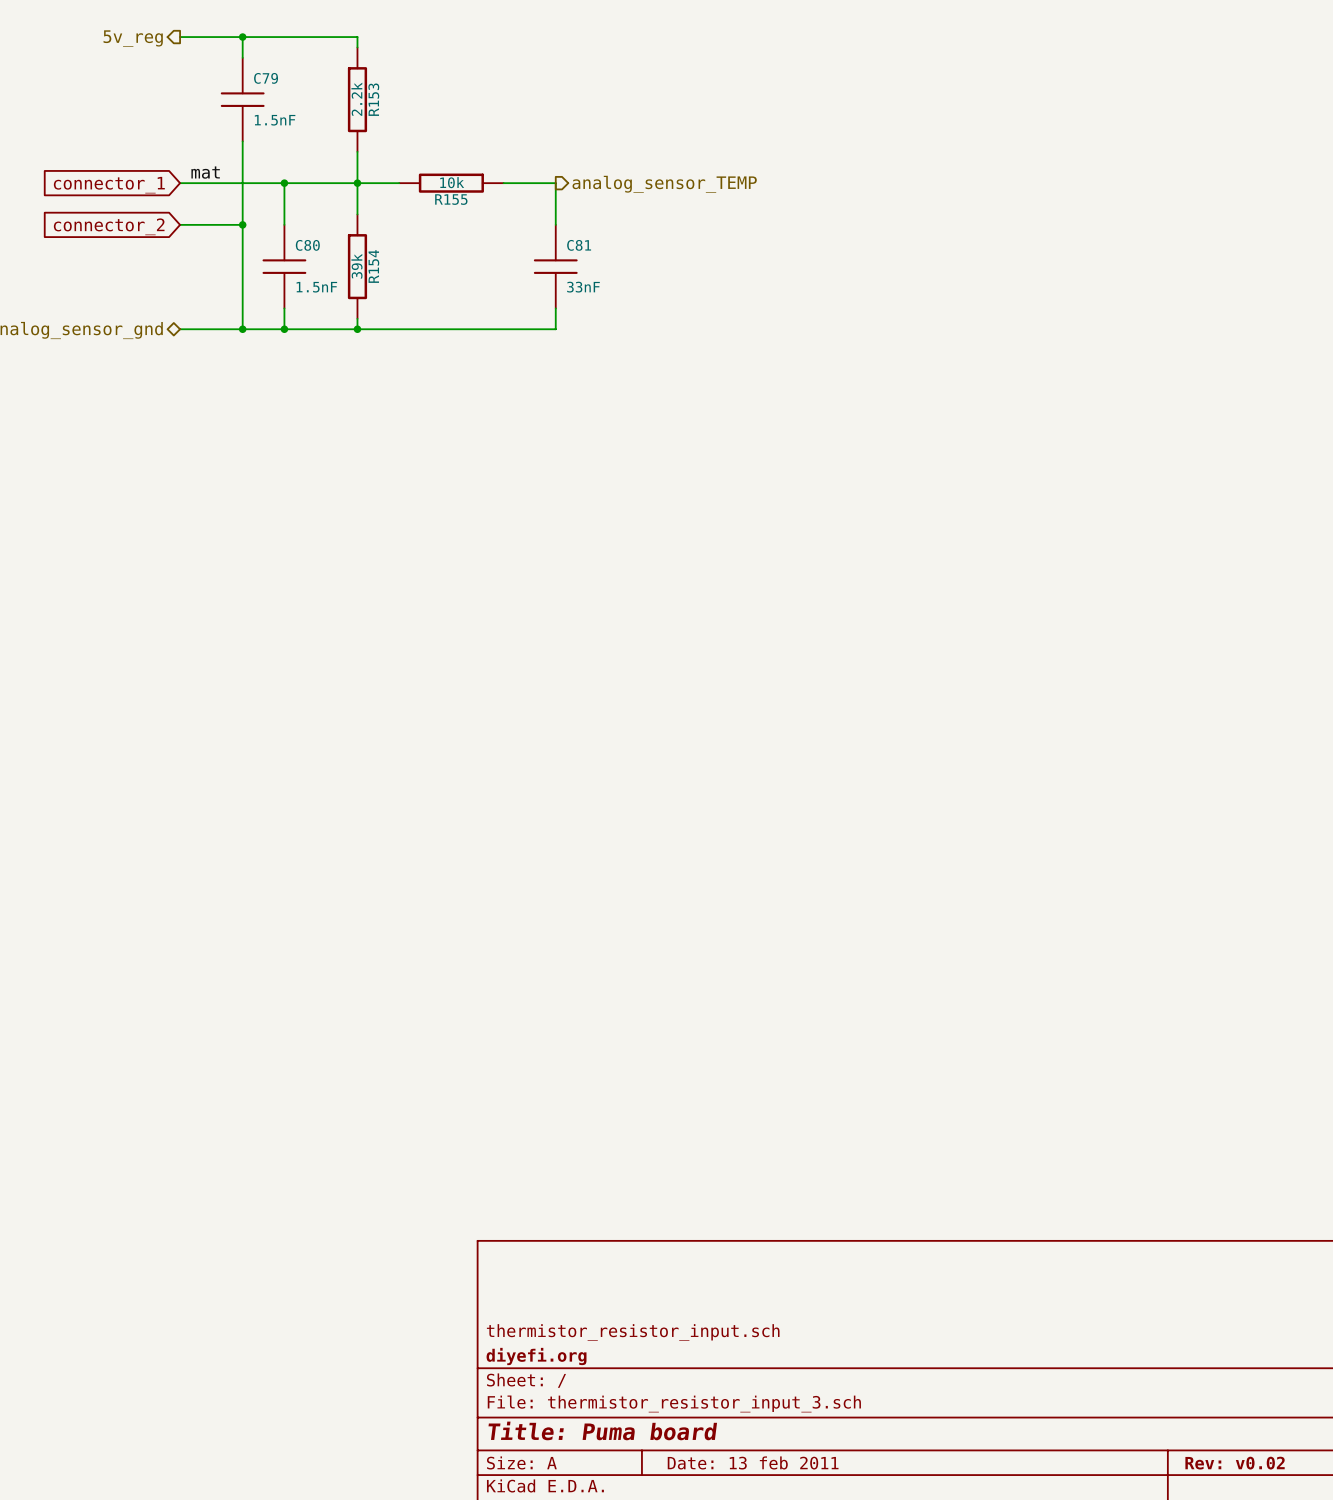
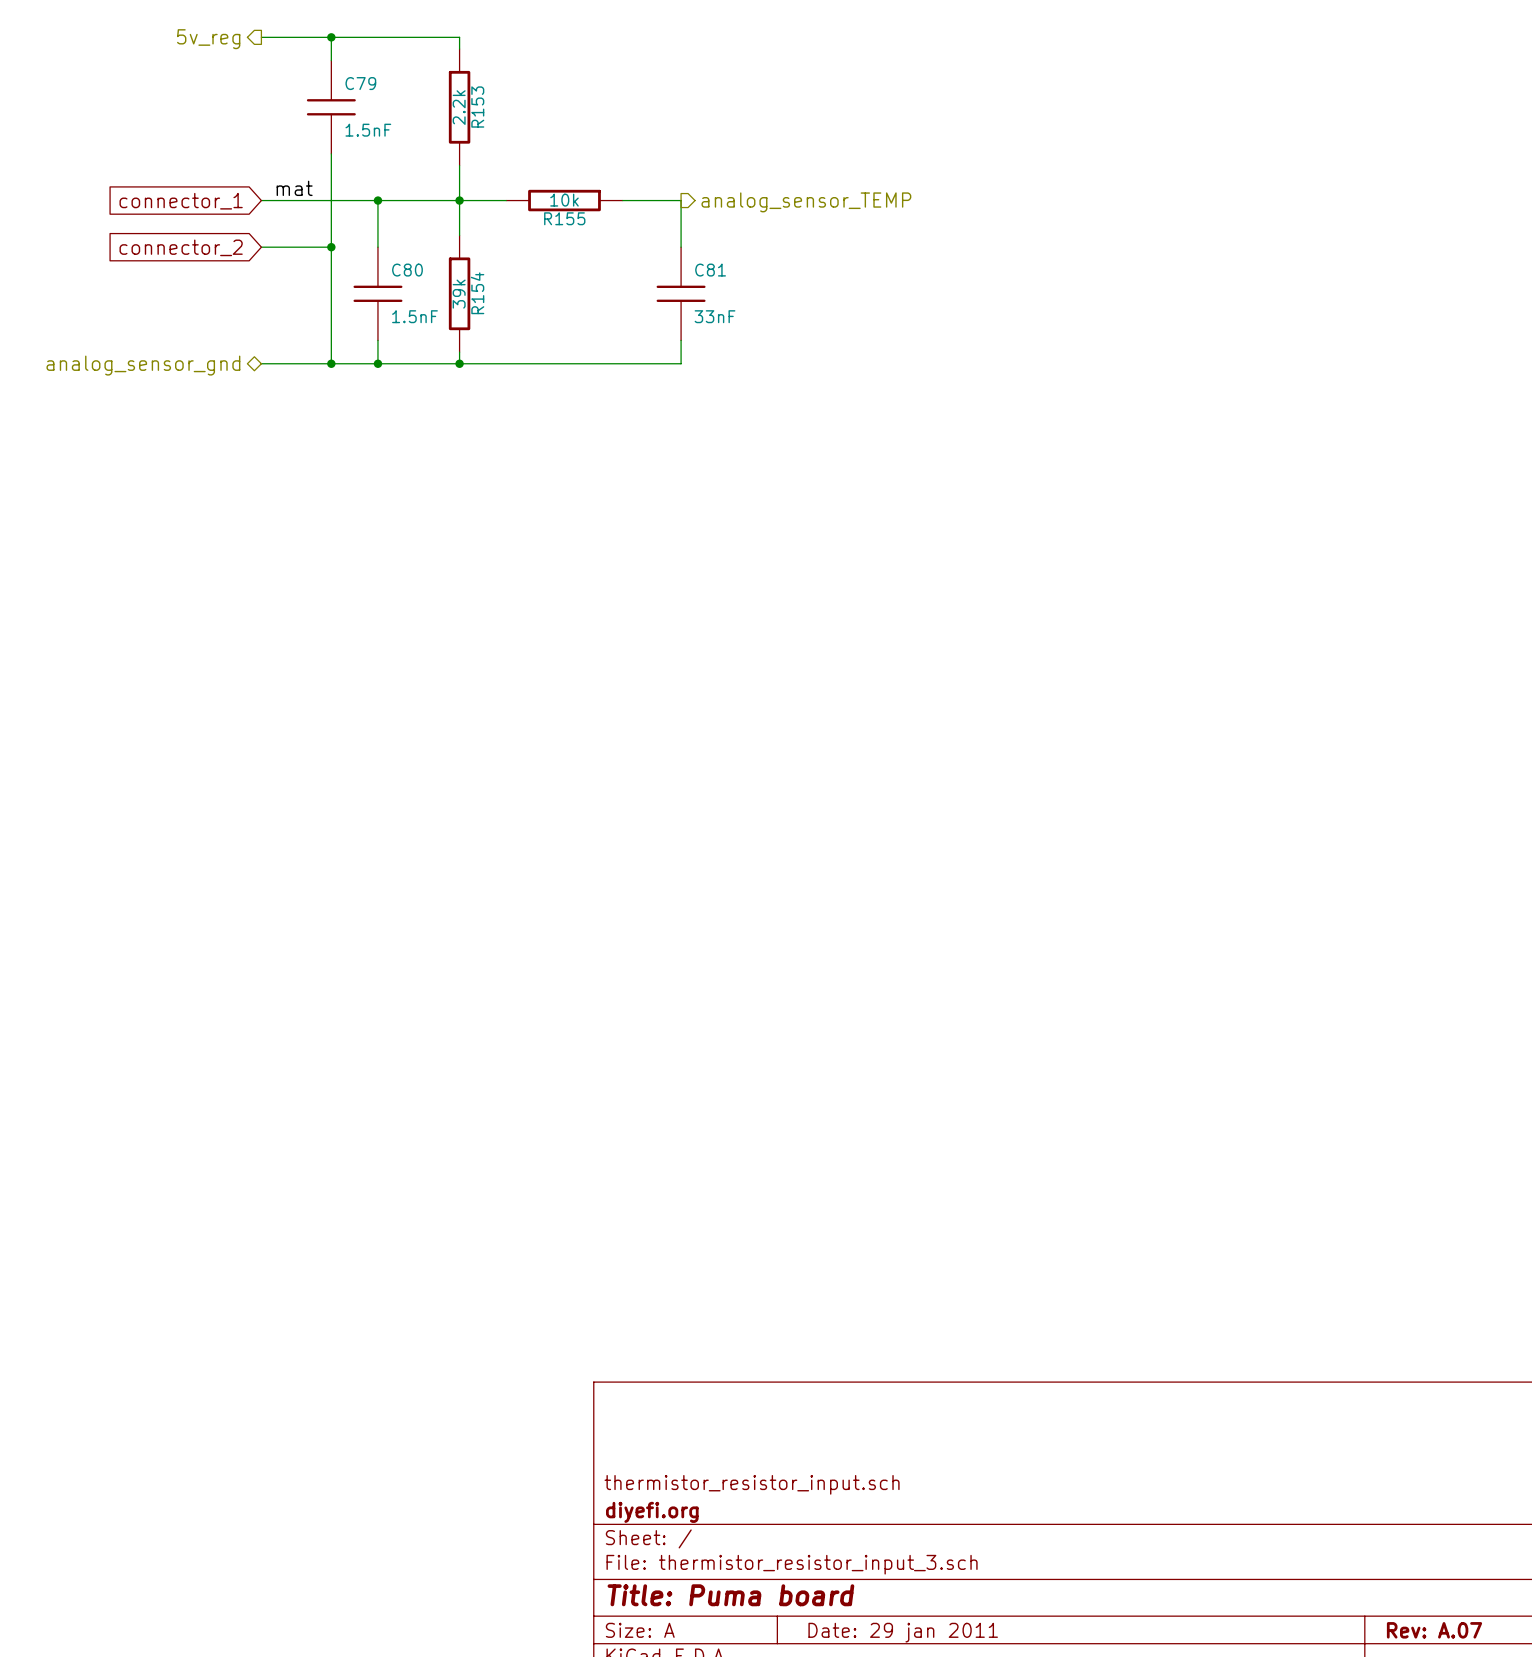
title block: Date: 13 feb 2011 (753, 1462) -> Date: 29 jan 2011 (903, 1632)
title block: Rev: v0.02 (1235, 1463) -> Rev: A.07 (1434, 1630)

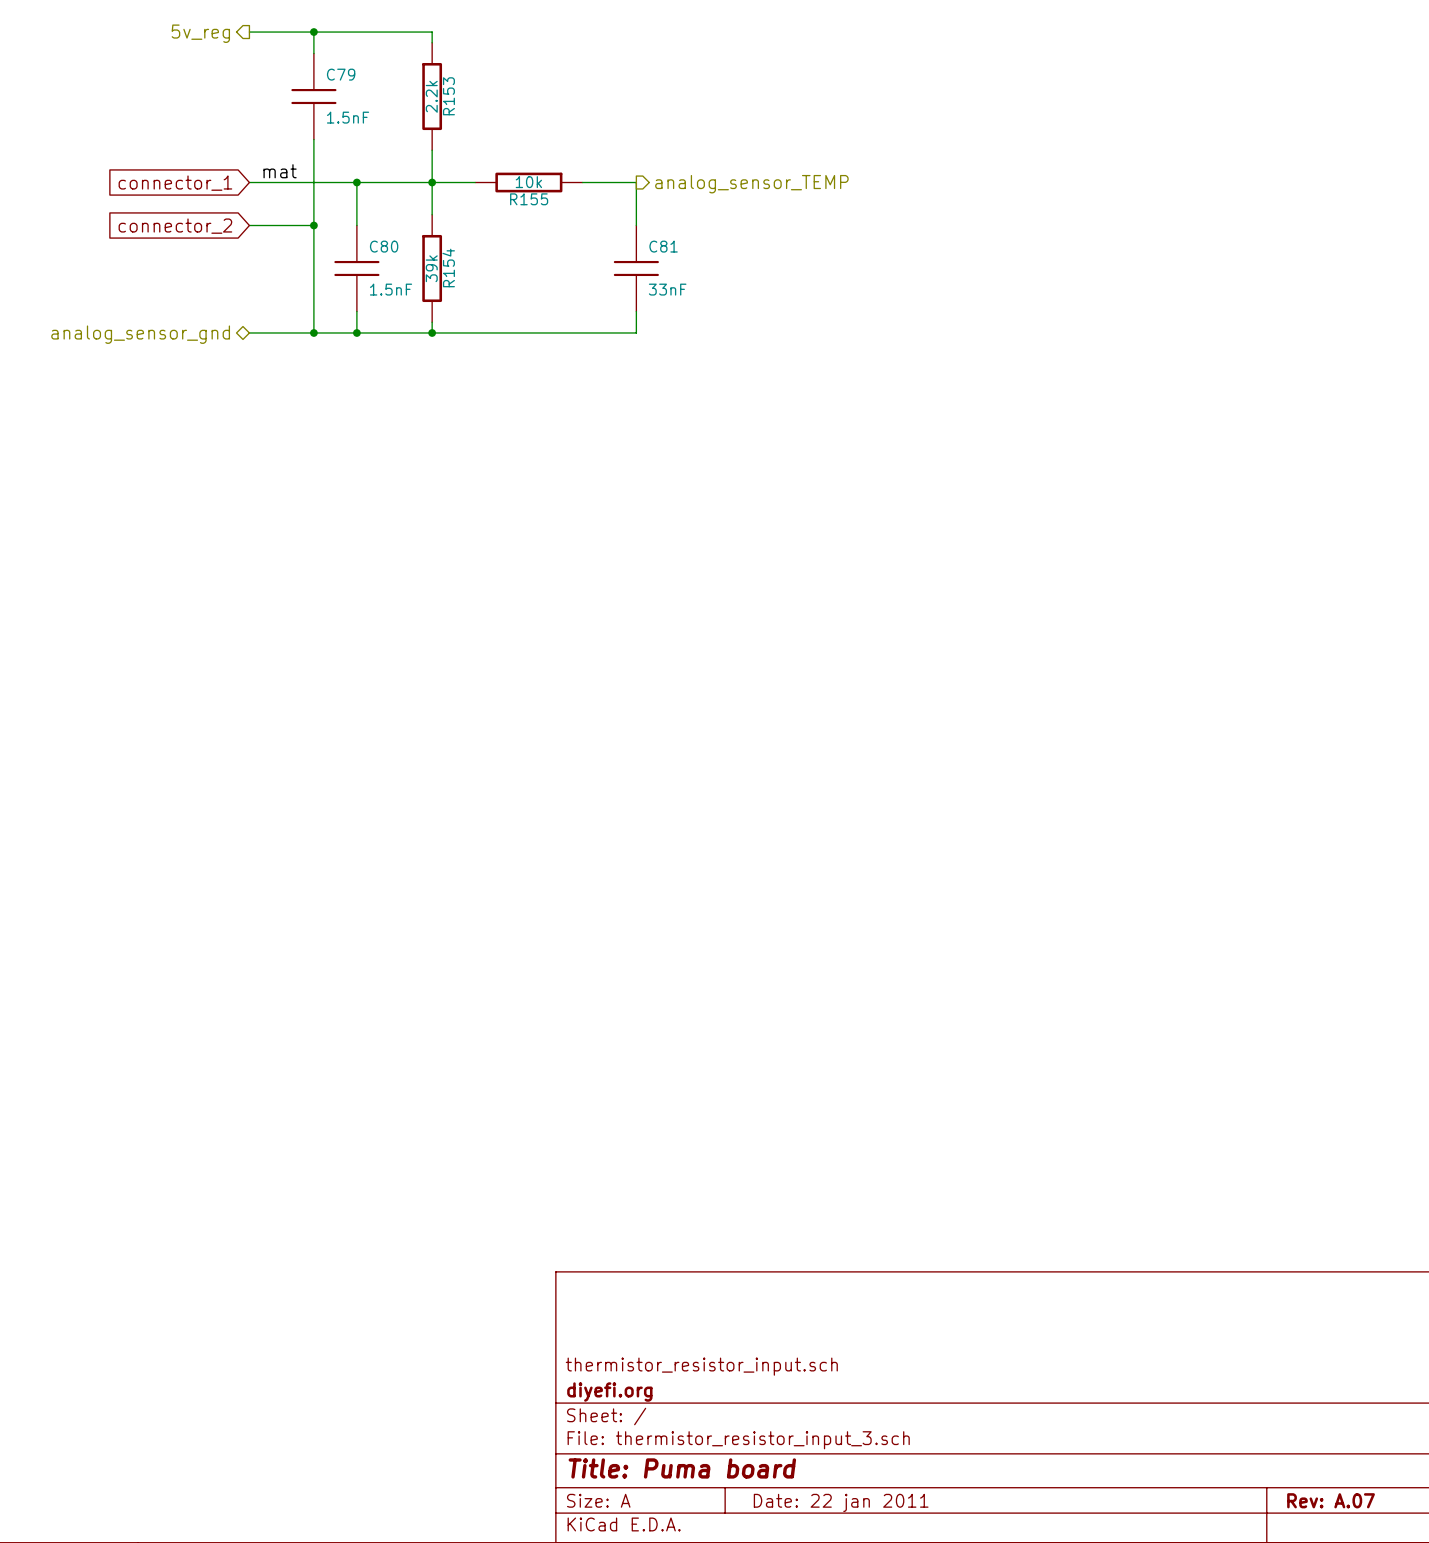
title block: Date: 29 jan 2011 (903, 1632) -> Date: 22 jan 2011 (841, 1502)

